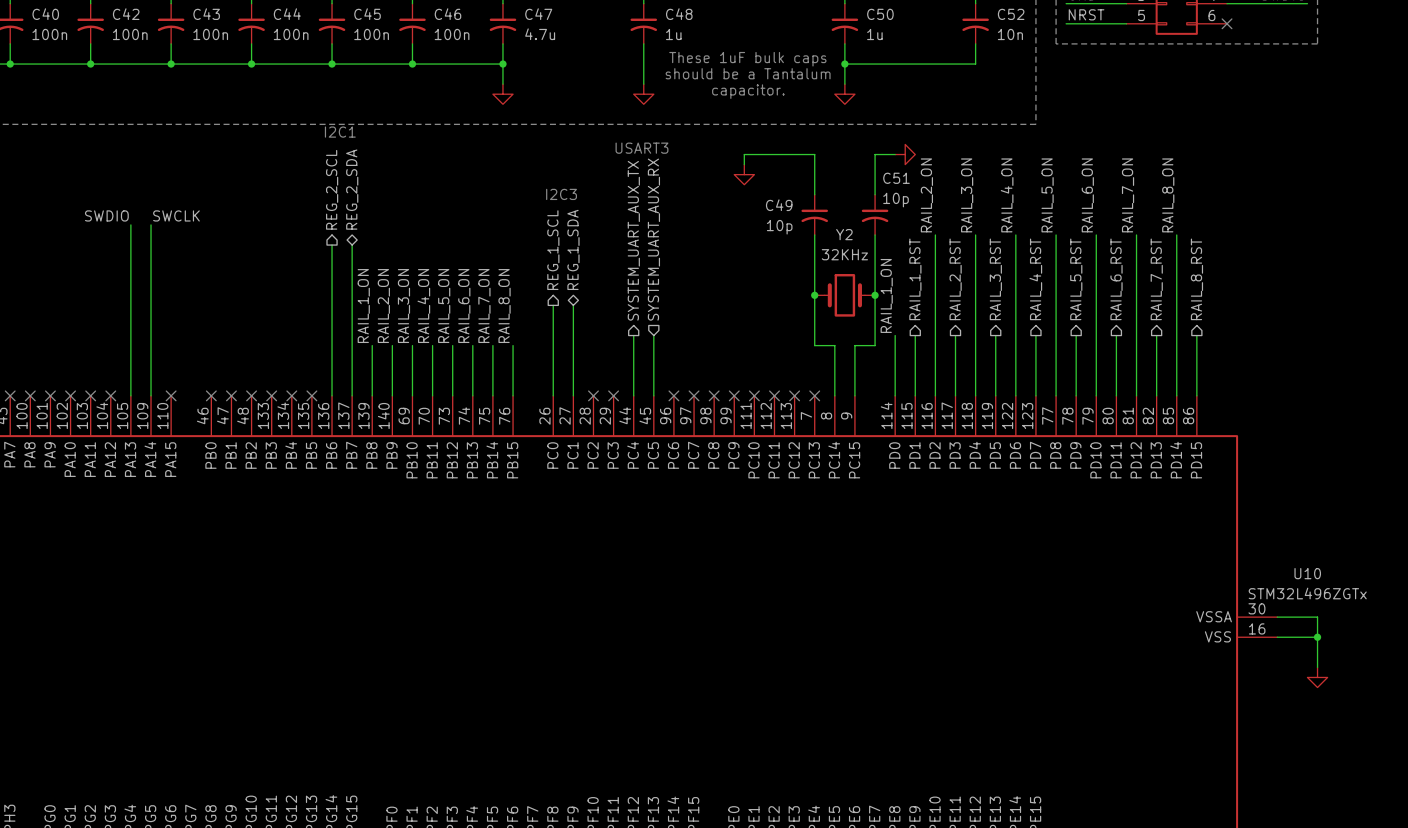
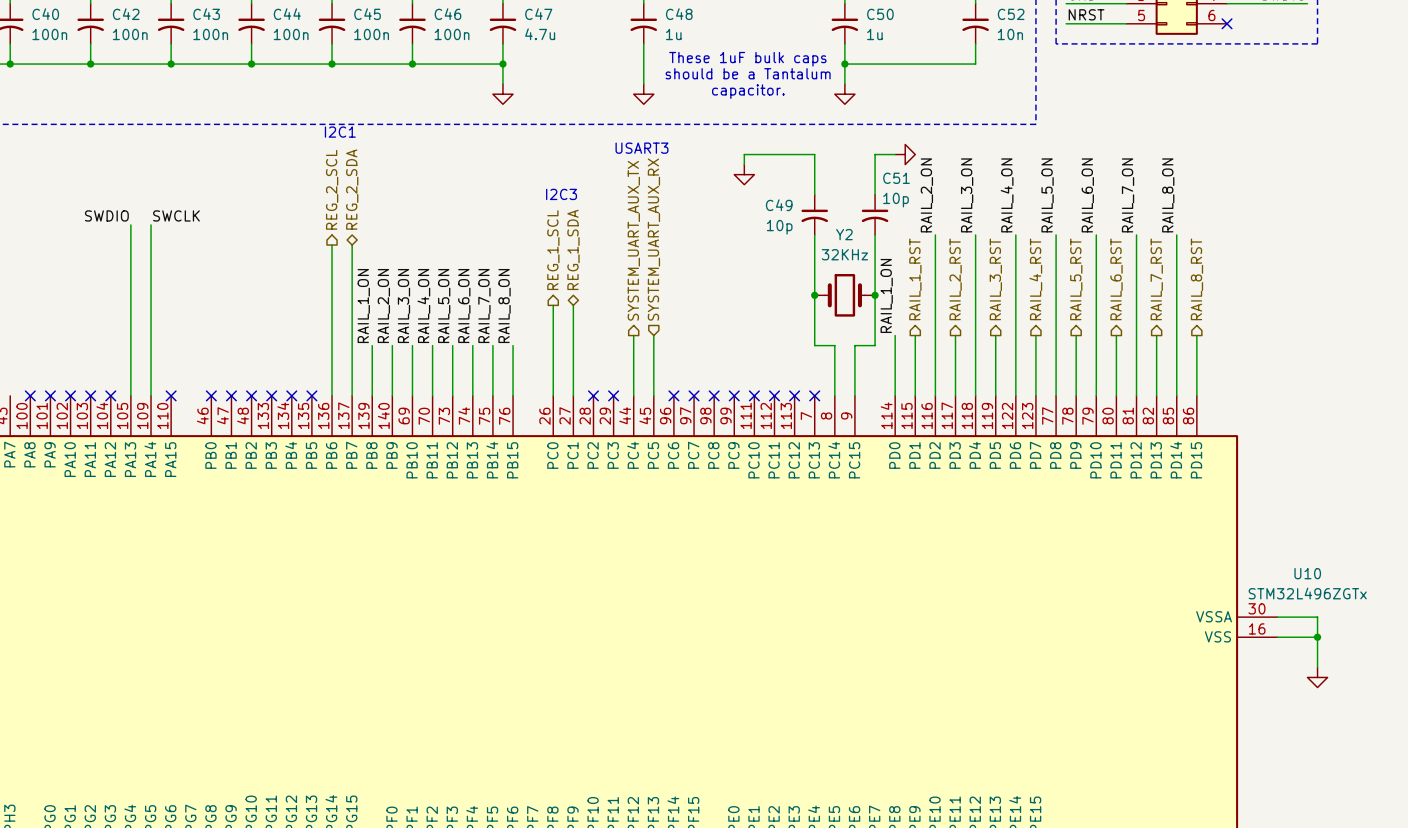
no-connect mark: (10, 395) -> none

